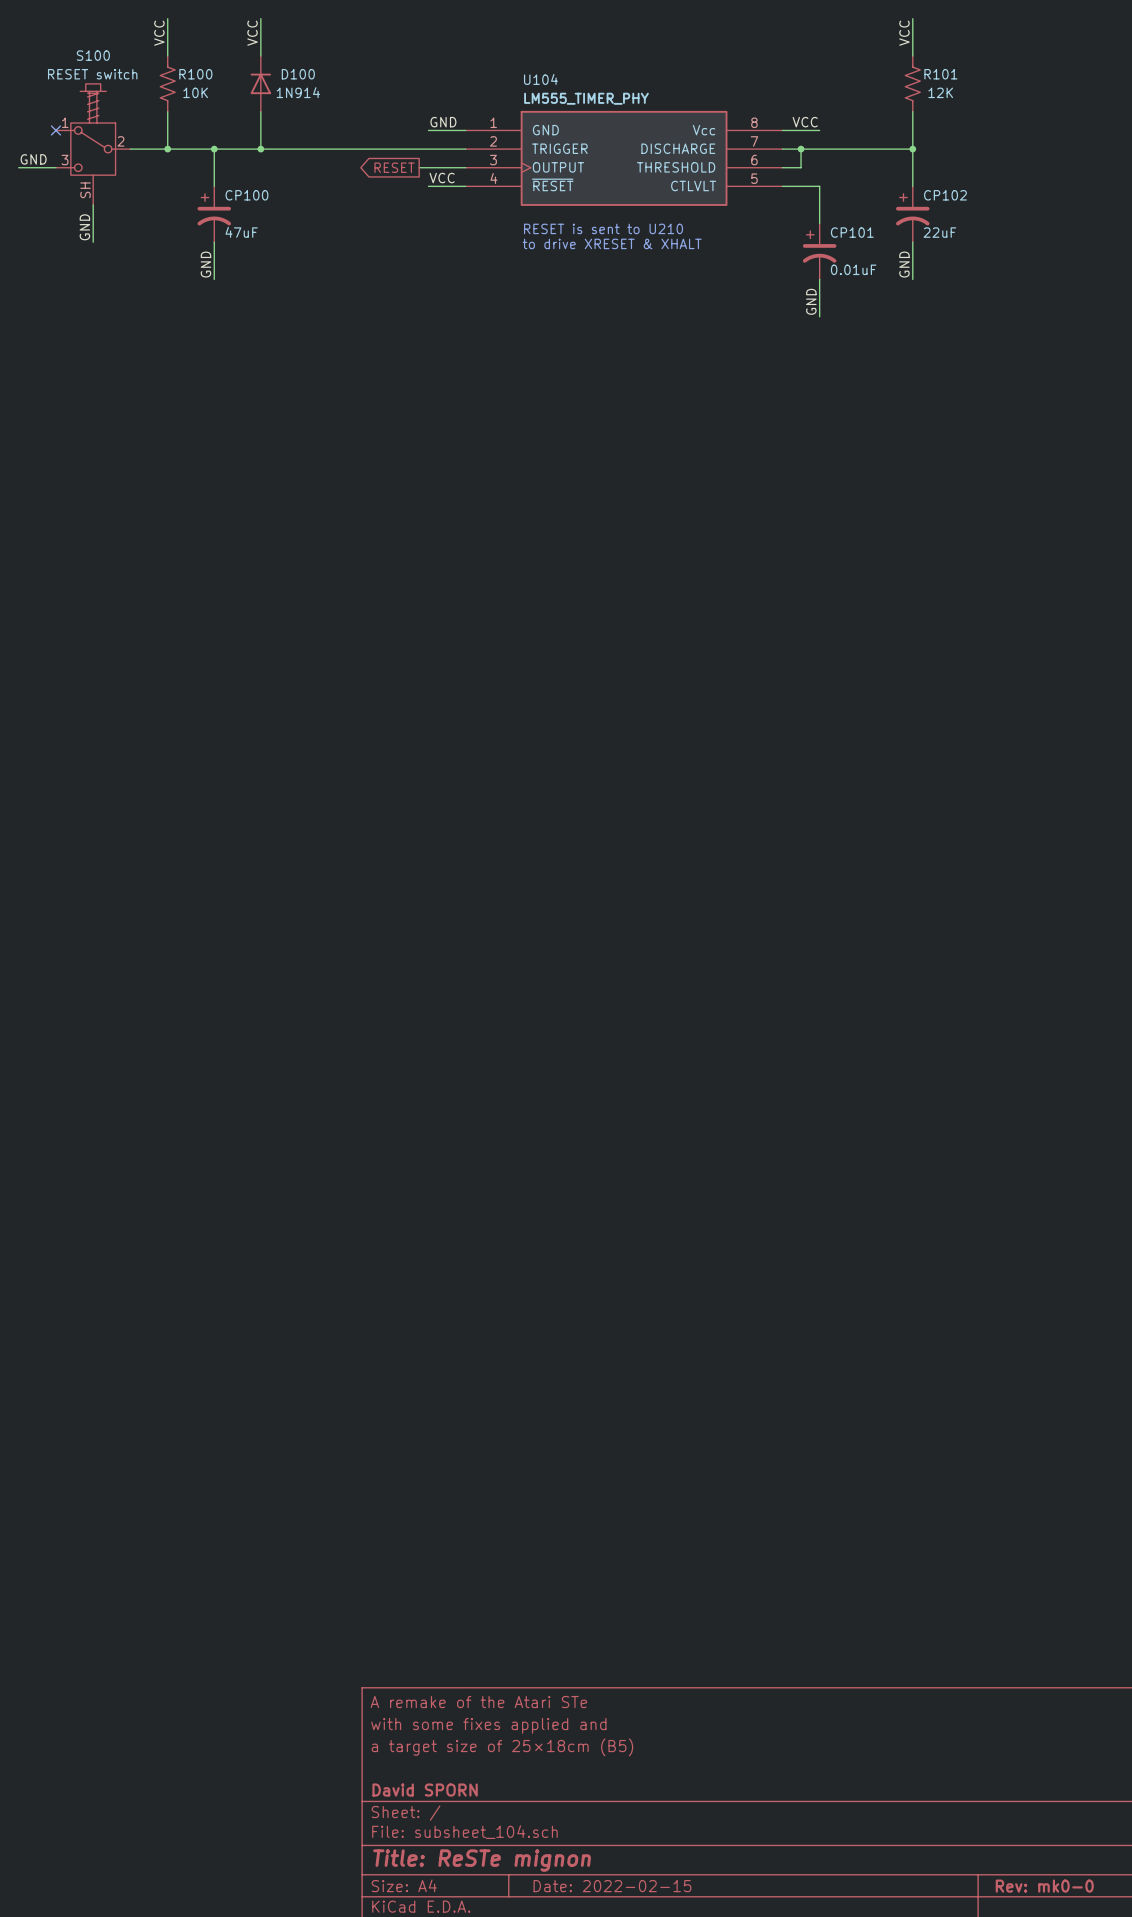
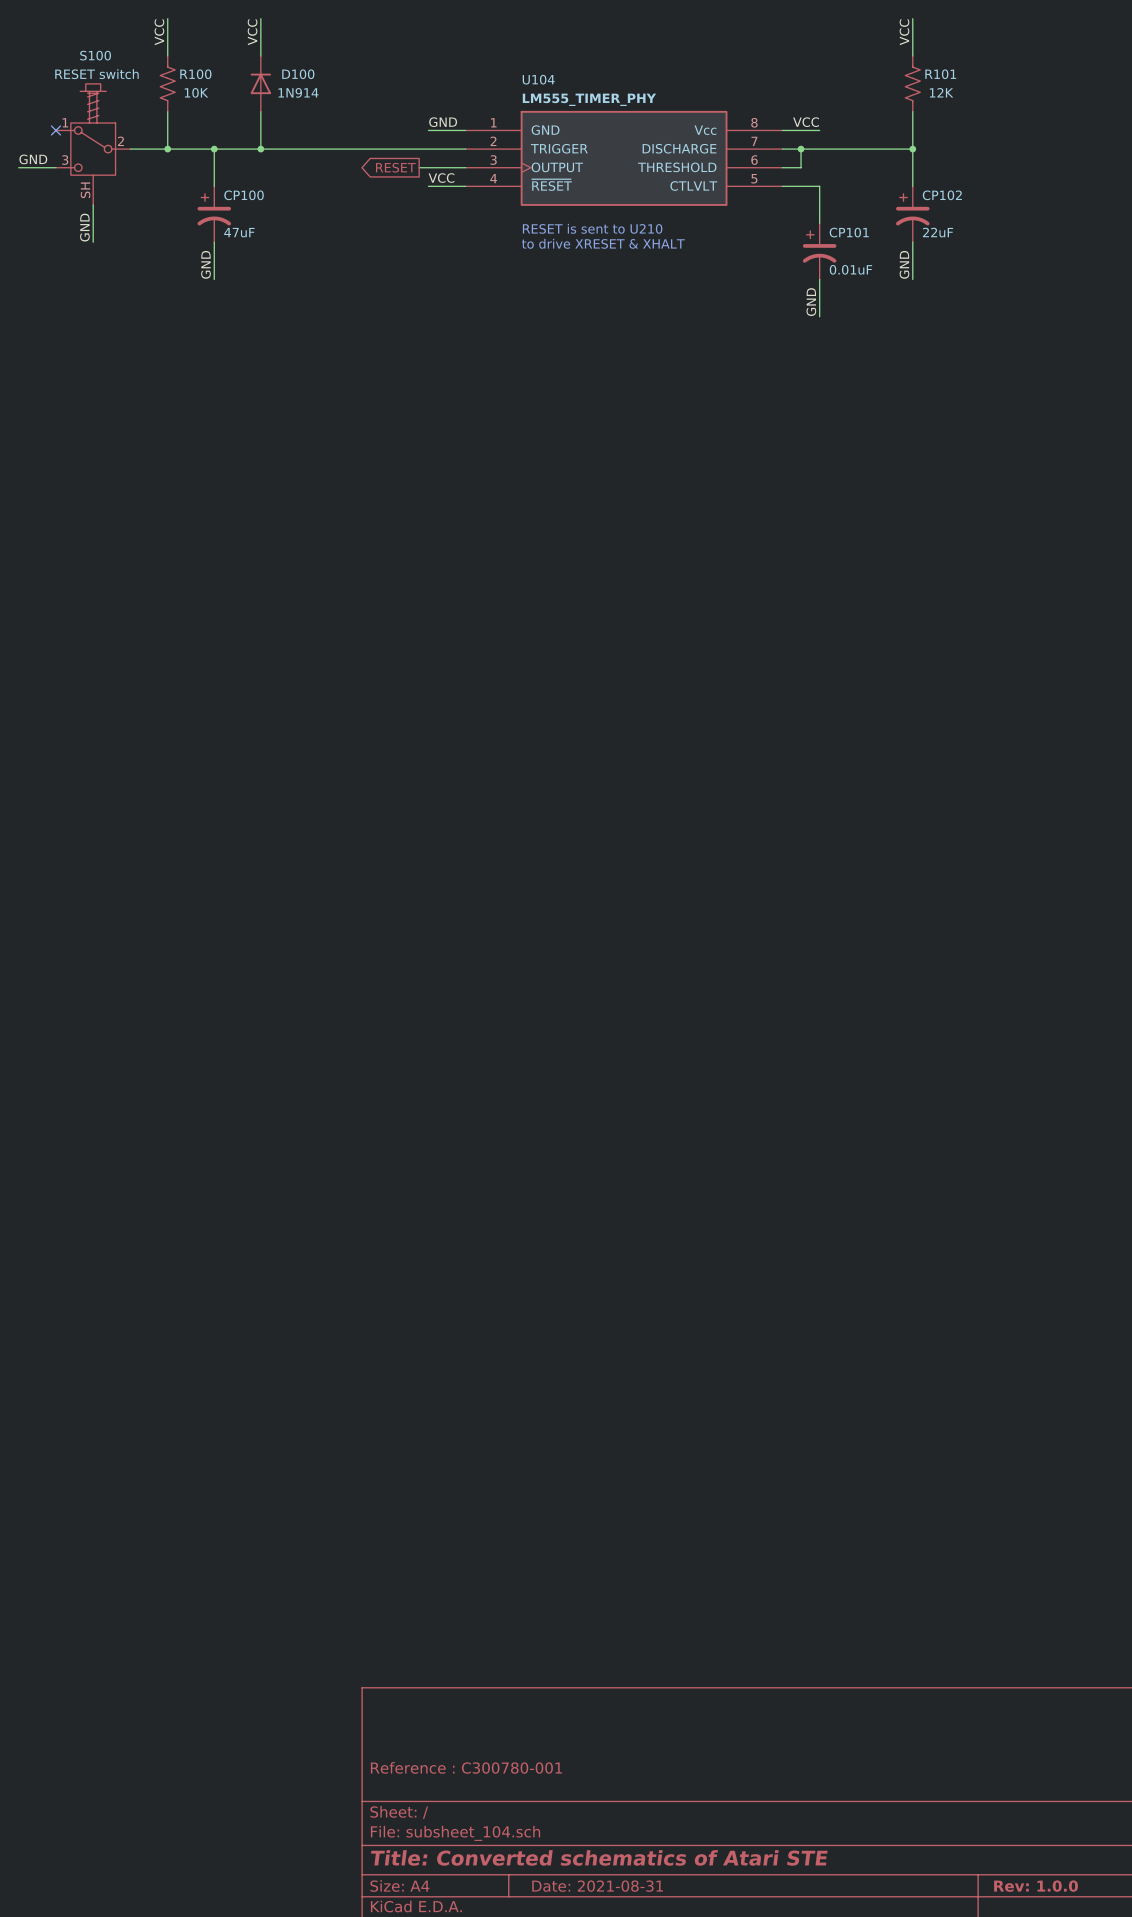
title block: A remake of the Atari STe (478, 1702) -> none
title block: with some fixes applied and (488, 1725) -> none
title block: a target size of 25×18cm (B5) (502, 1747) -> none
title block: none -> Reference : C300780-001 (466, 1767)
title block: David SPORN (425, 1790) -> none
title block: Title: ReSTe mignon (482, 1860) -> Title: Converted schematics of Atari STE (599, 1857)
title block: Date: 2022-02-15 (612, 1886) -> Date: 2021-08-31 (597, 1886)
title block: Rev: mk0-0 (1044, 1886) -> Rev: 1.0.0 (1036, 1886)

